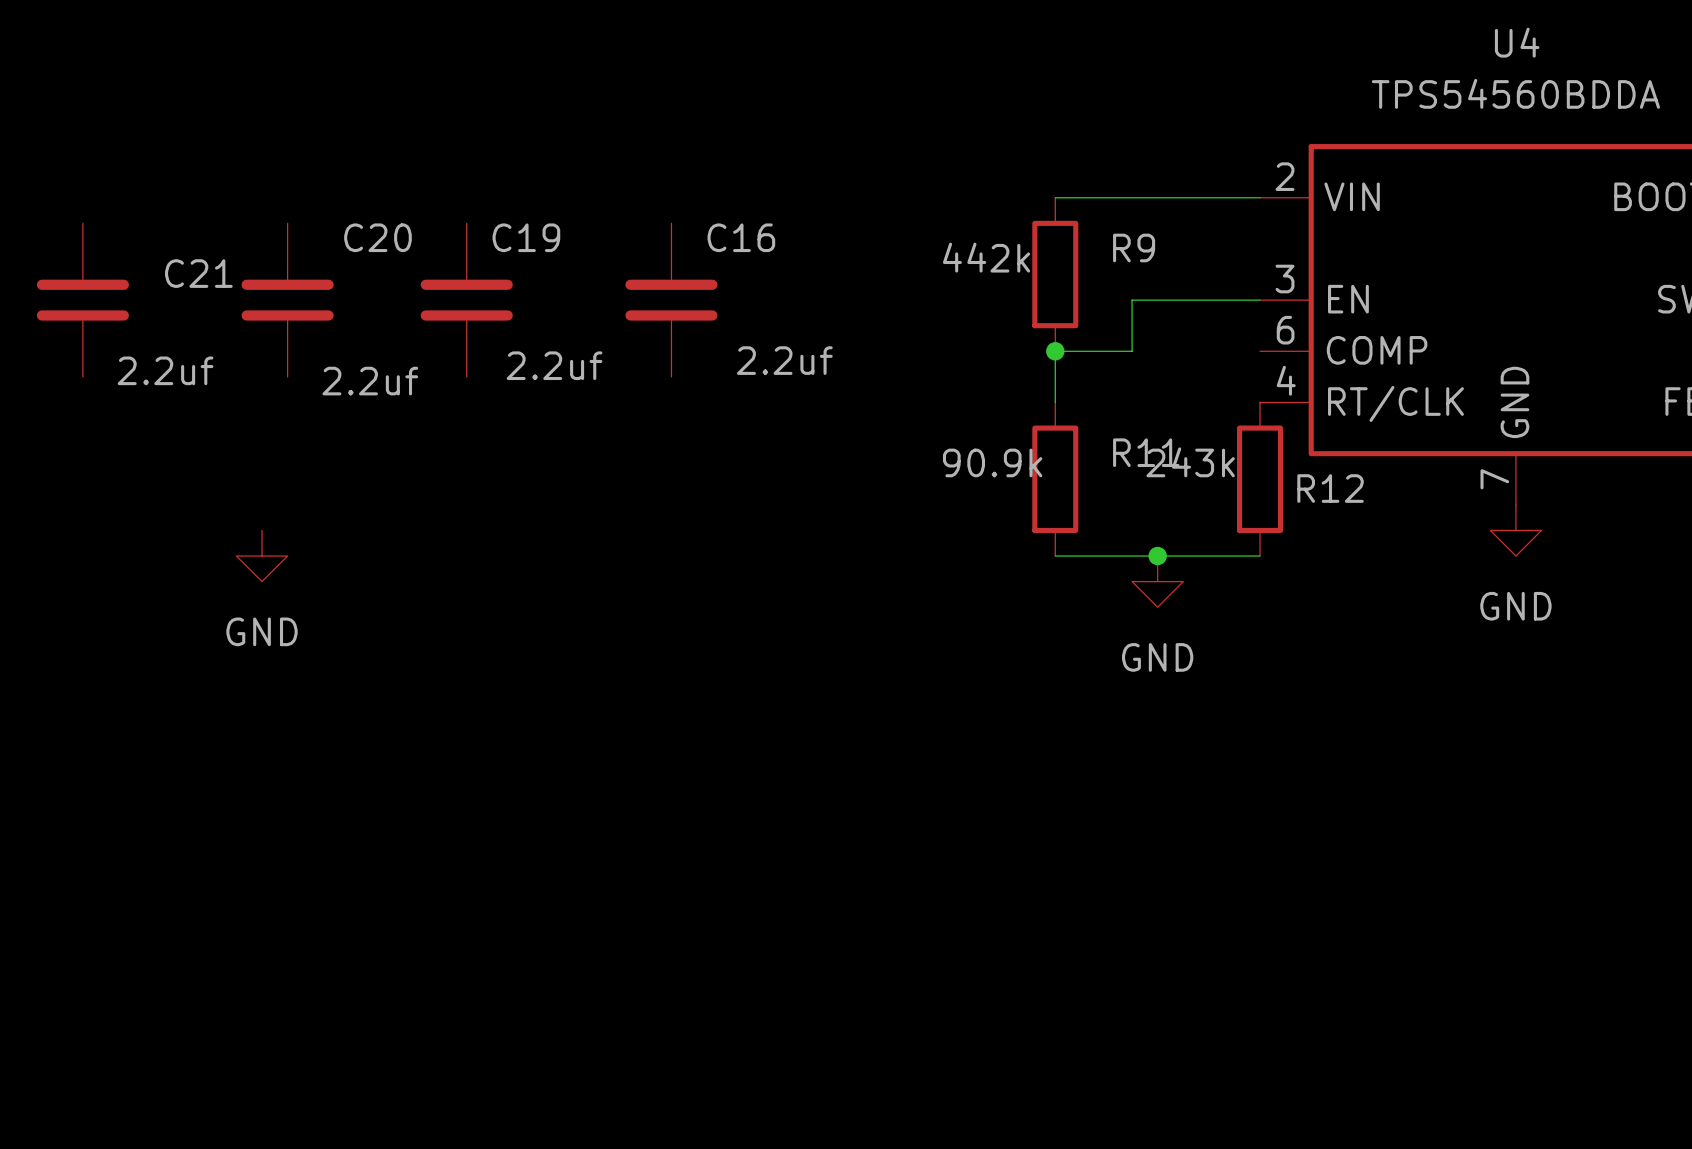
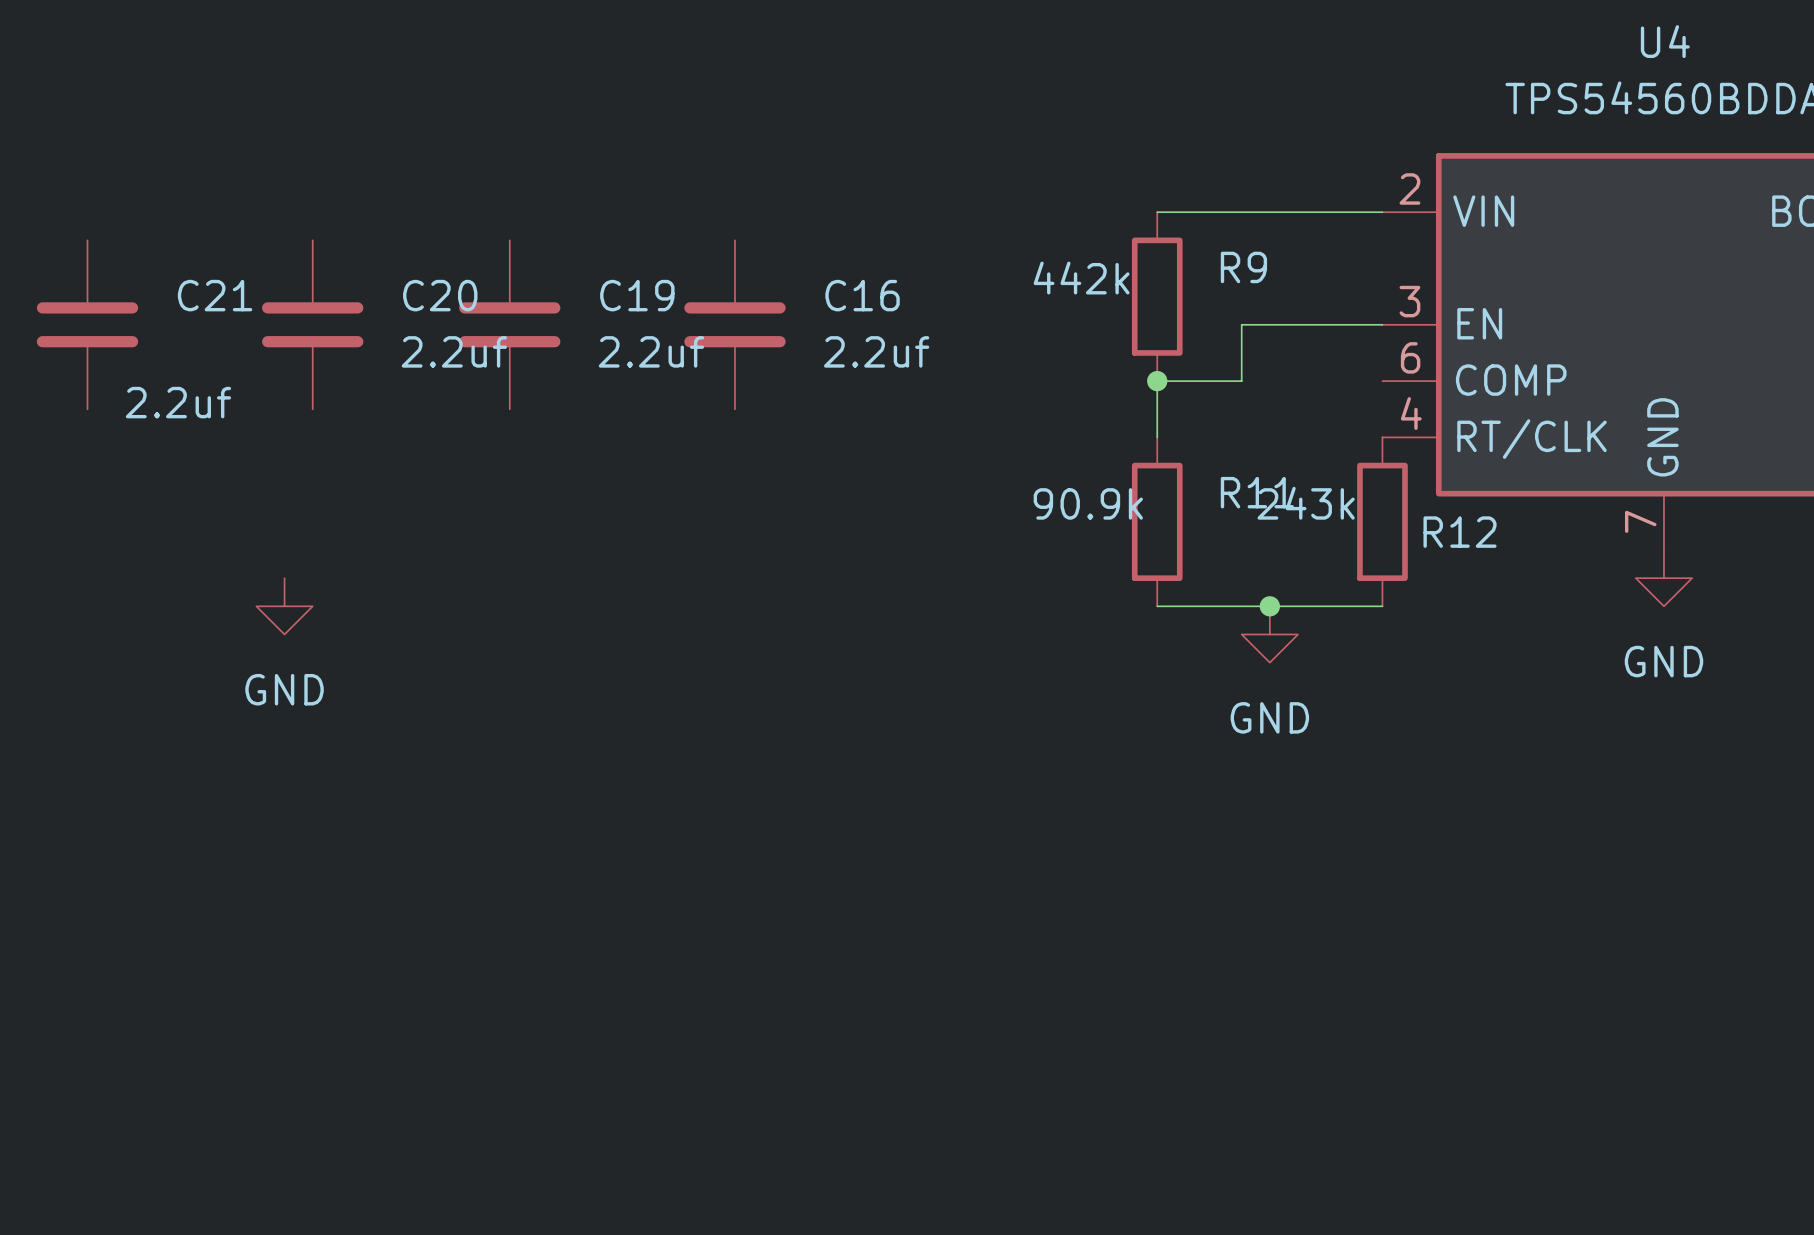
C20 name position: C20 (377, 237) -> C20 (440, 295)
C19 name position: C19 (526, 237) -> C19 (637, 295)
C16 name position: C16 (741, 237) -> C16 (862, 295)
C16 value position: 2.2uf (784, 360) -> 2.2uf (876, 351)
C19 value position: 2.2uf (554, 365) -> 2.2uf (651, 351)
C20 value position: 2.2uf (370, 381) -> 2.2uf (454, 351)

